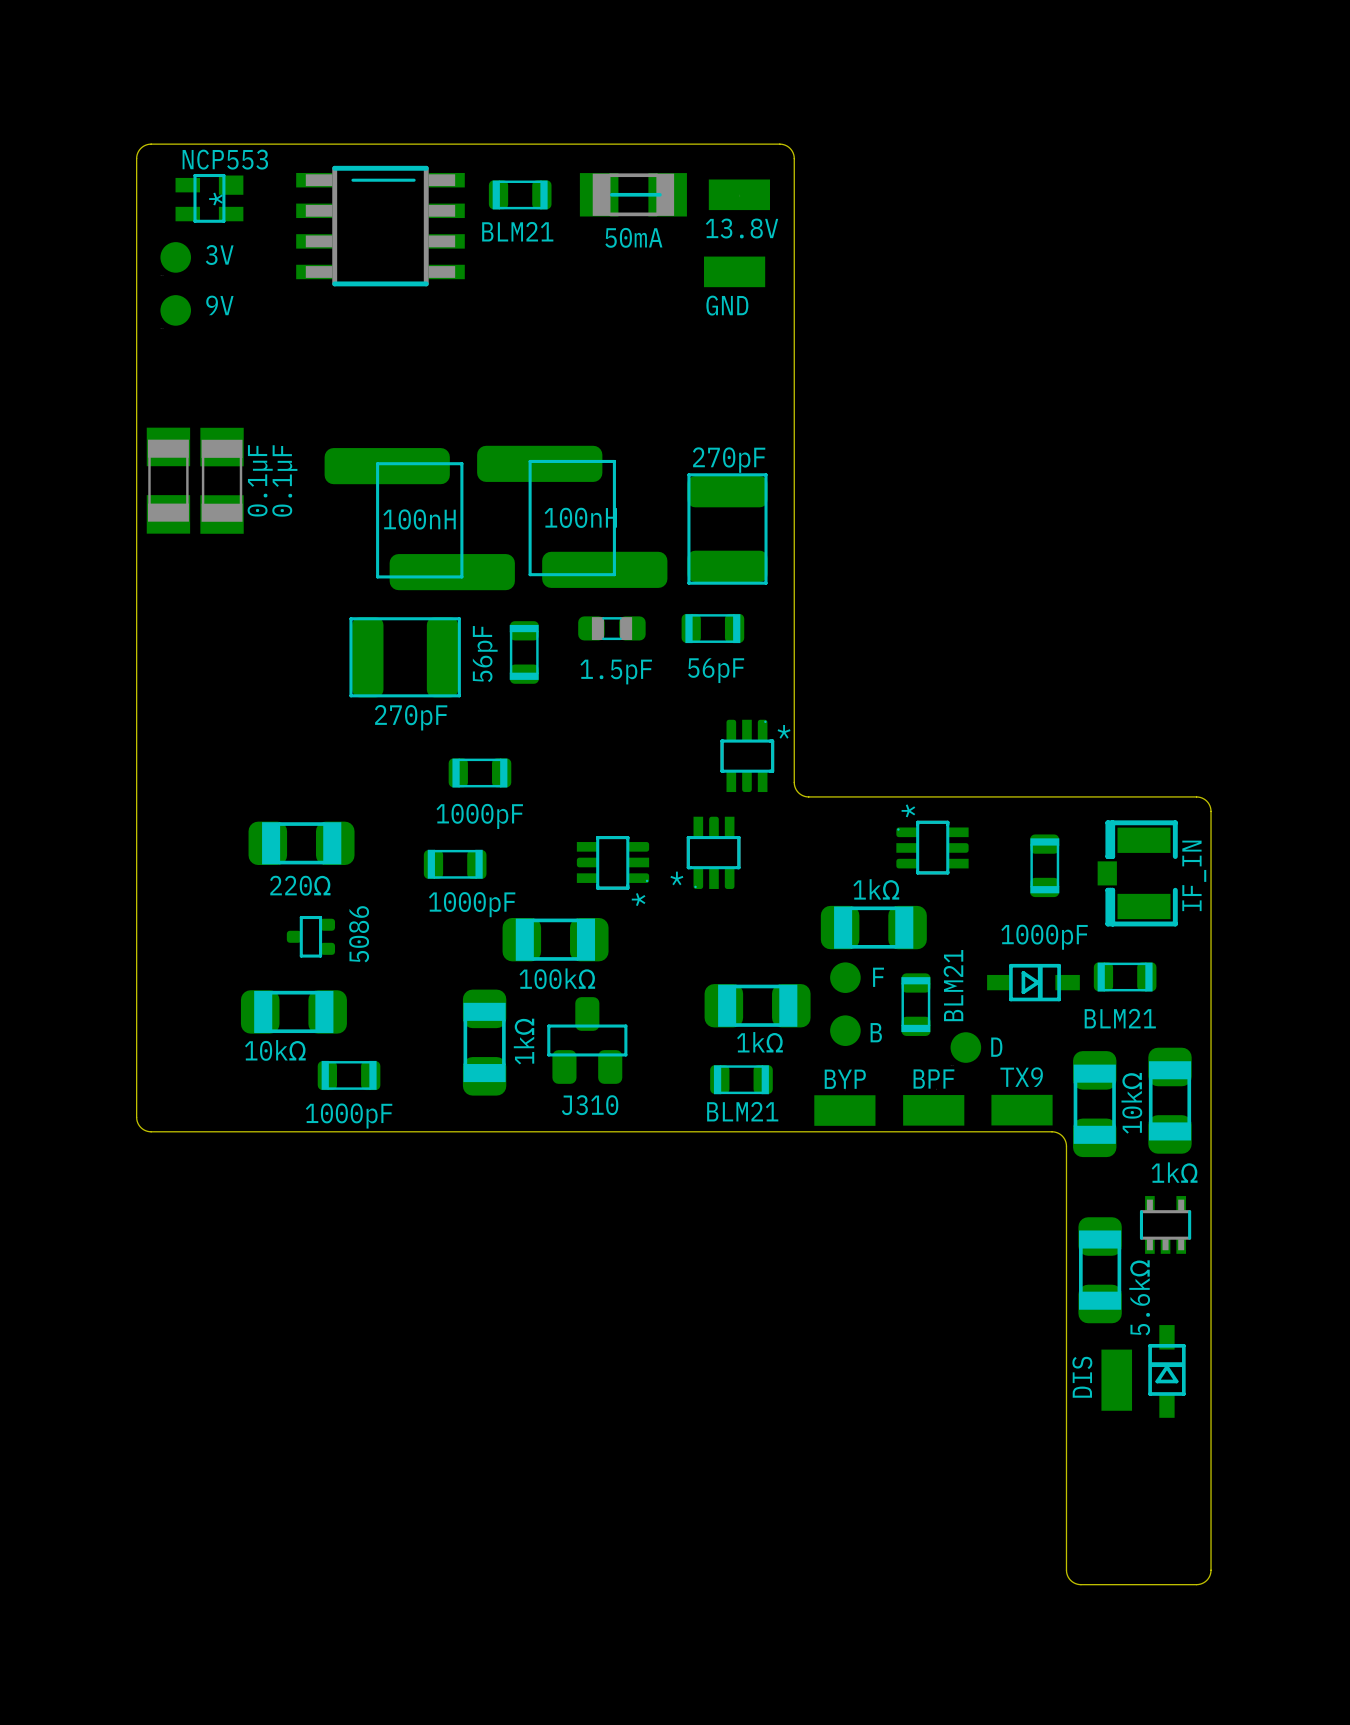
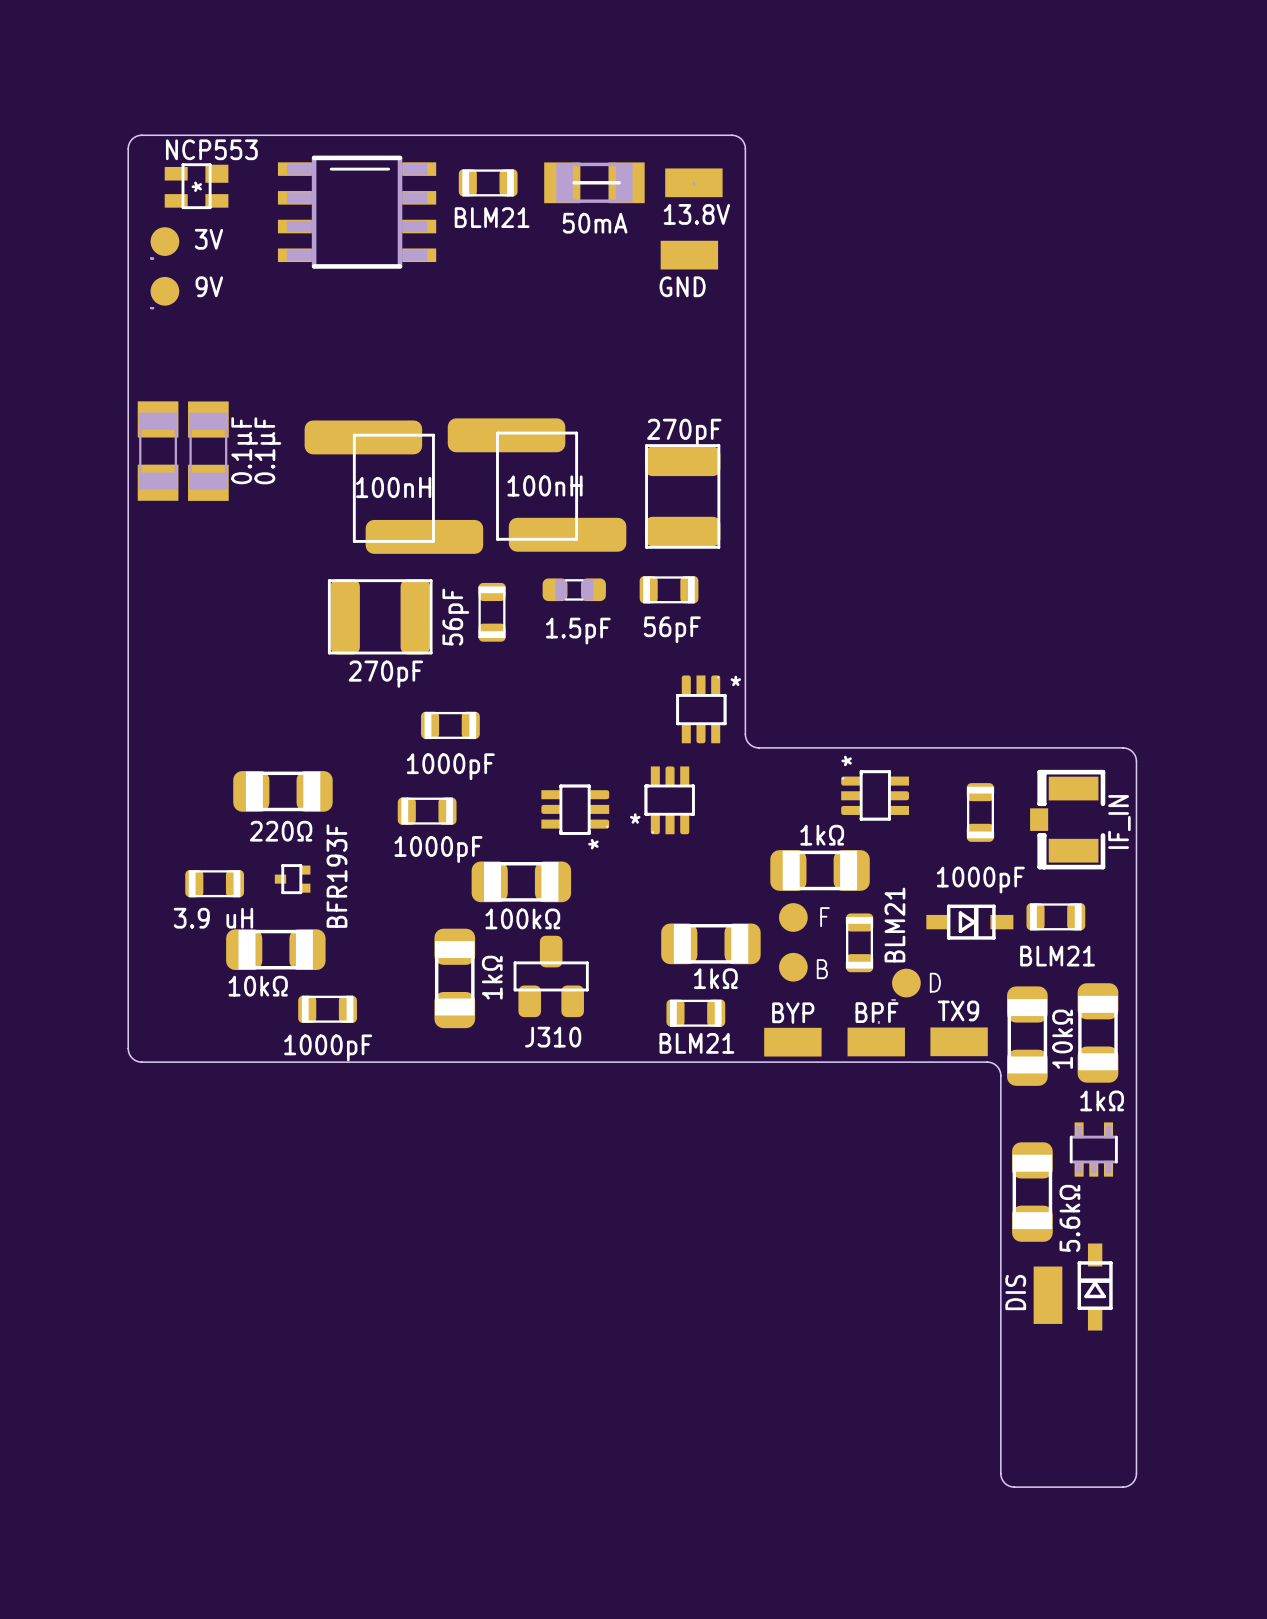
part footprint: [286, 915, 336, 958] -> [274, 864, 311, 895]
part value: 5086 (359, 934) -> BFR193F (337, 876)
part: none -> 3.9 uH (214, 883)

